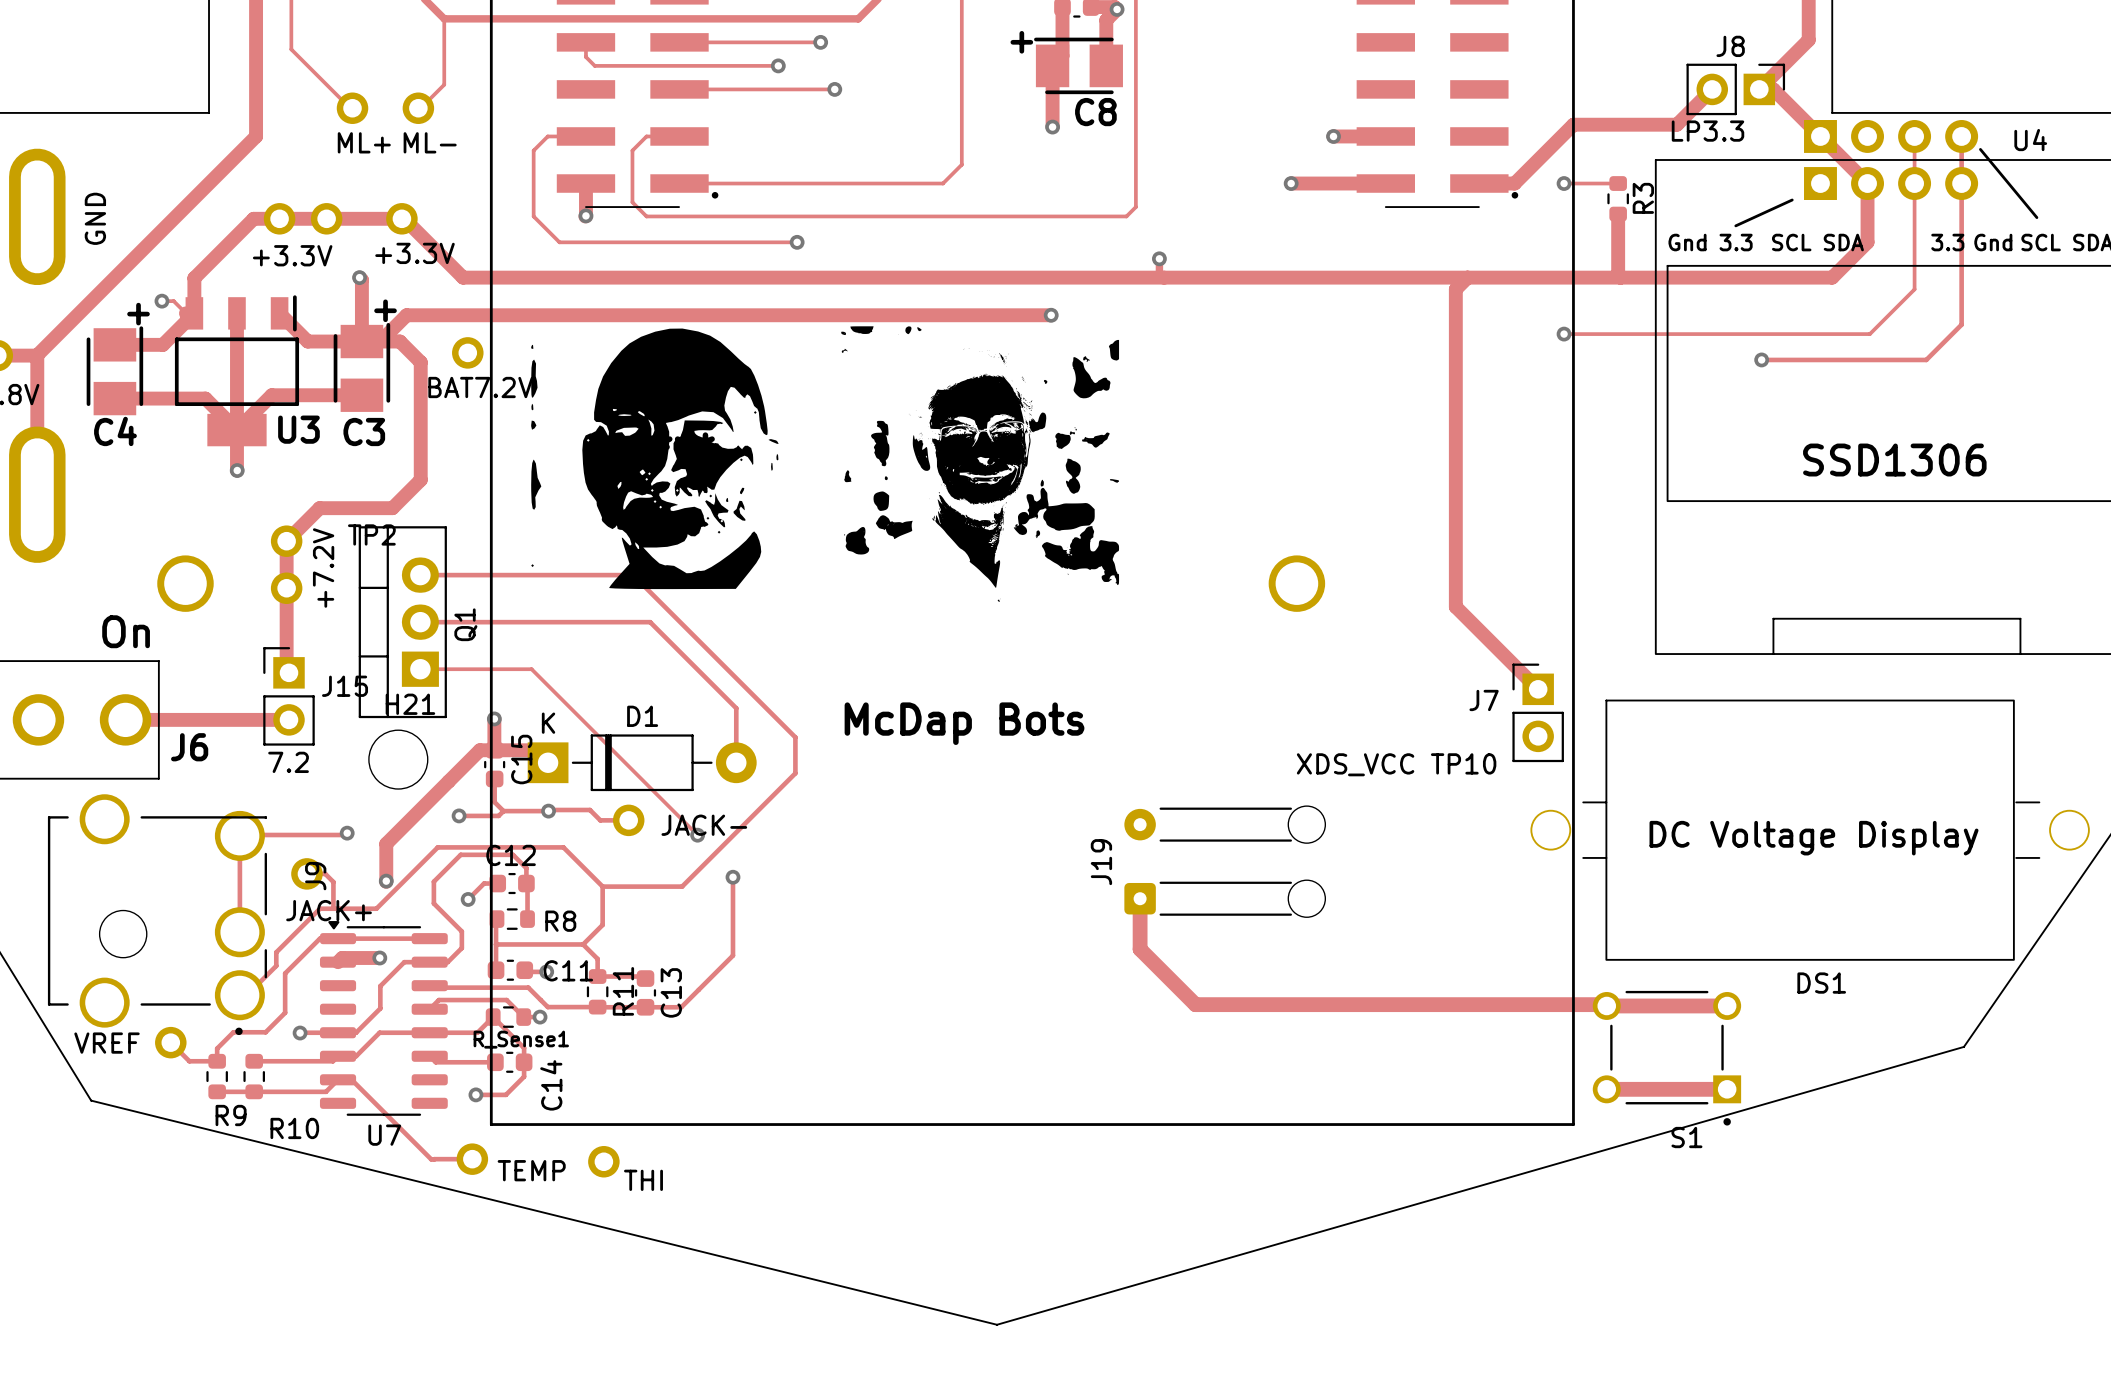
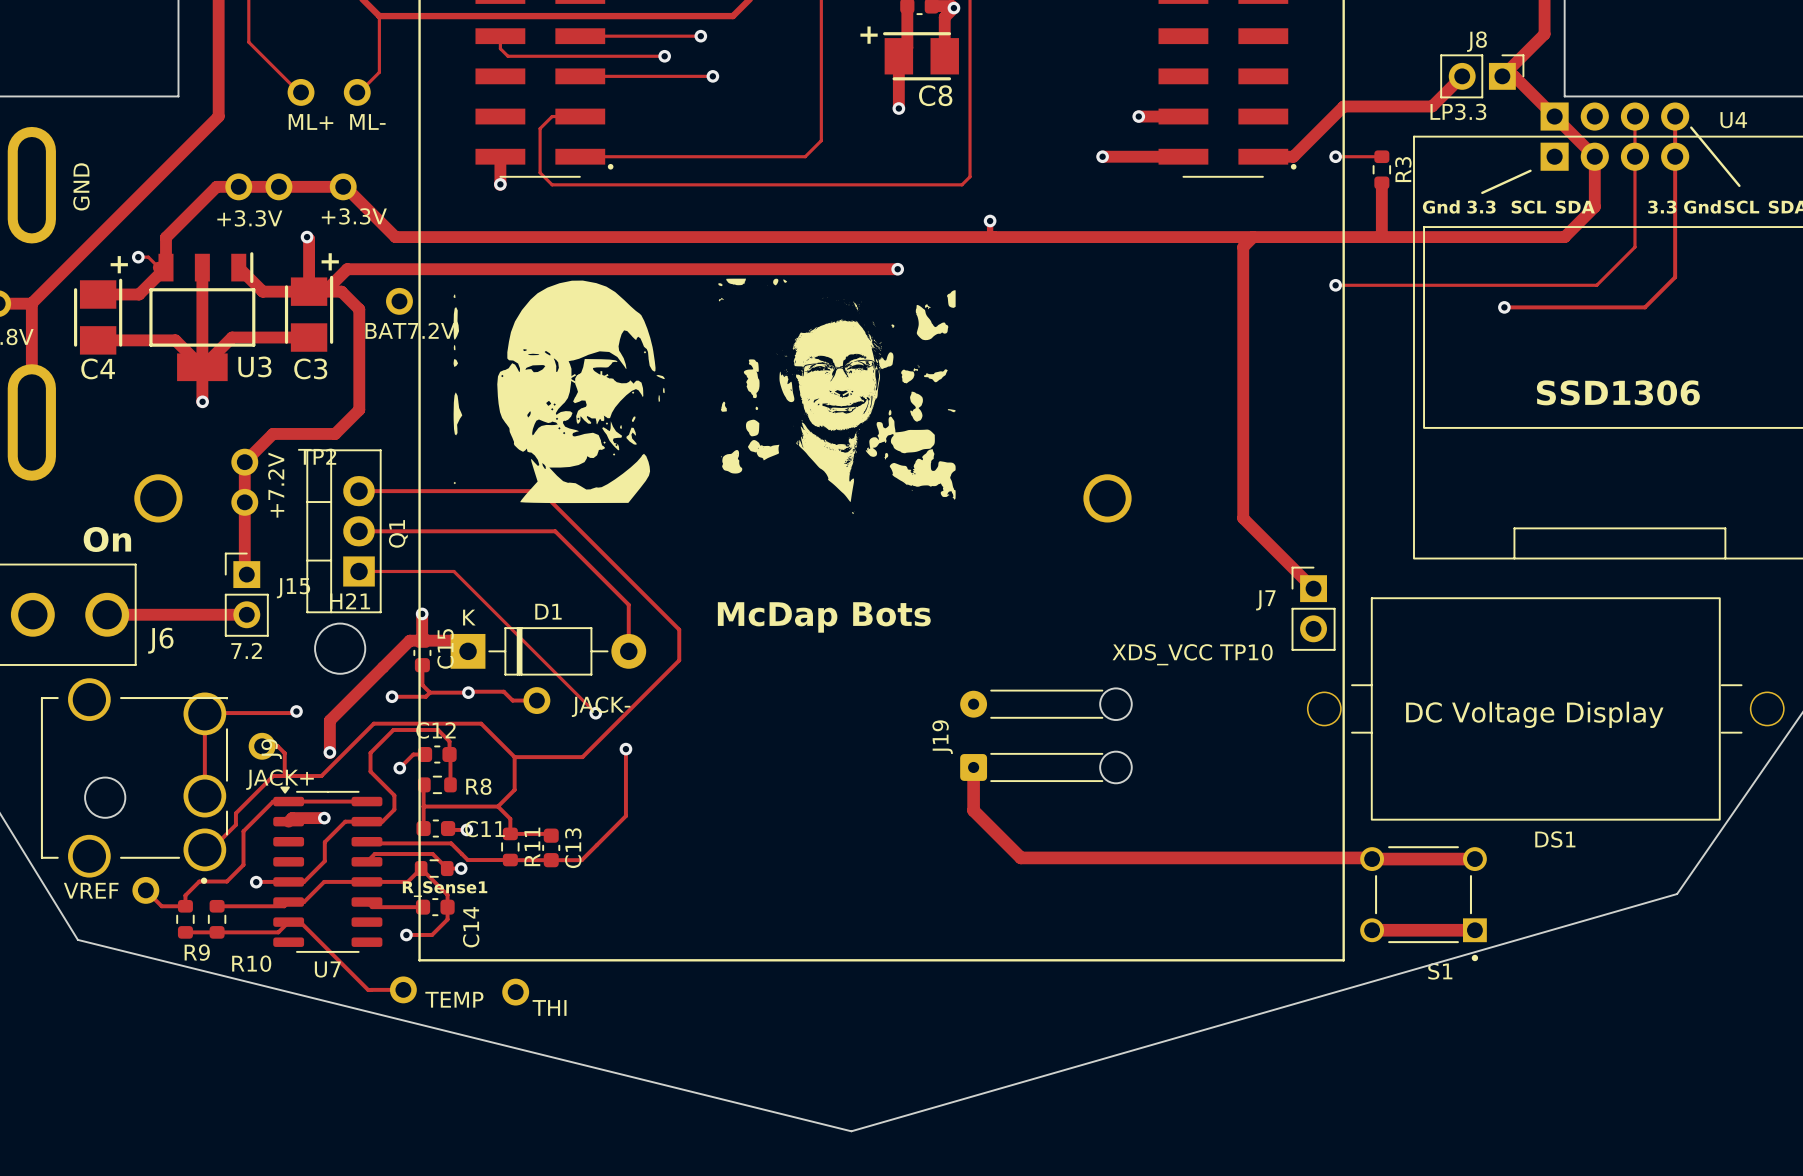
track: (585, 136) (547, 136) (533, 150) (533, 216) (559, 242) (797, 242) -> none
via: (797, 242) -> none

